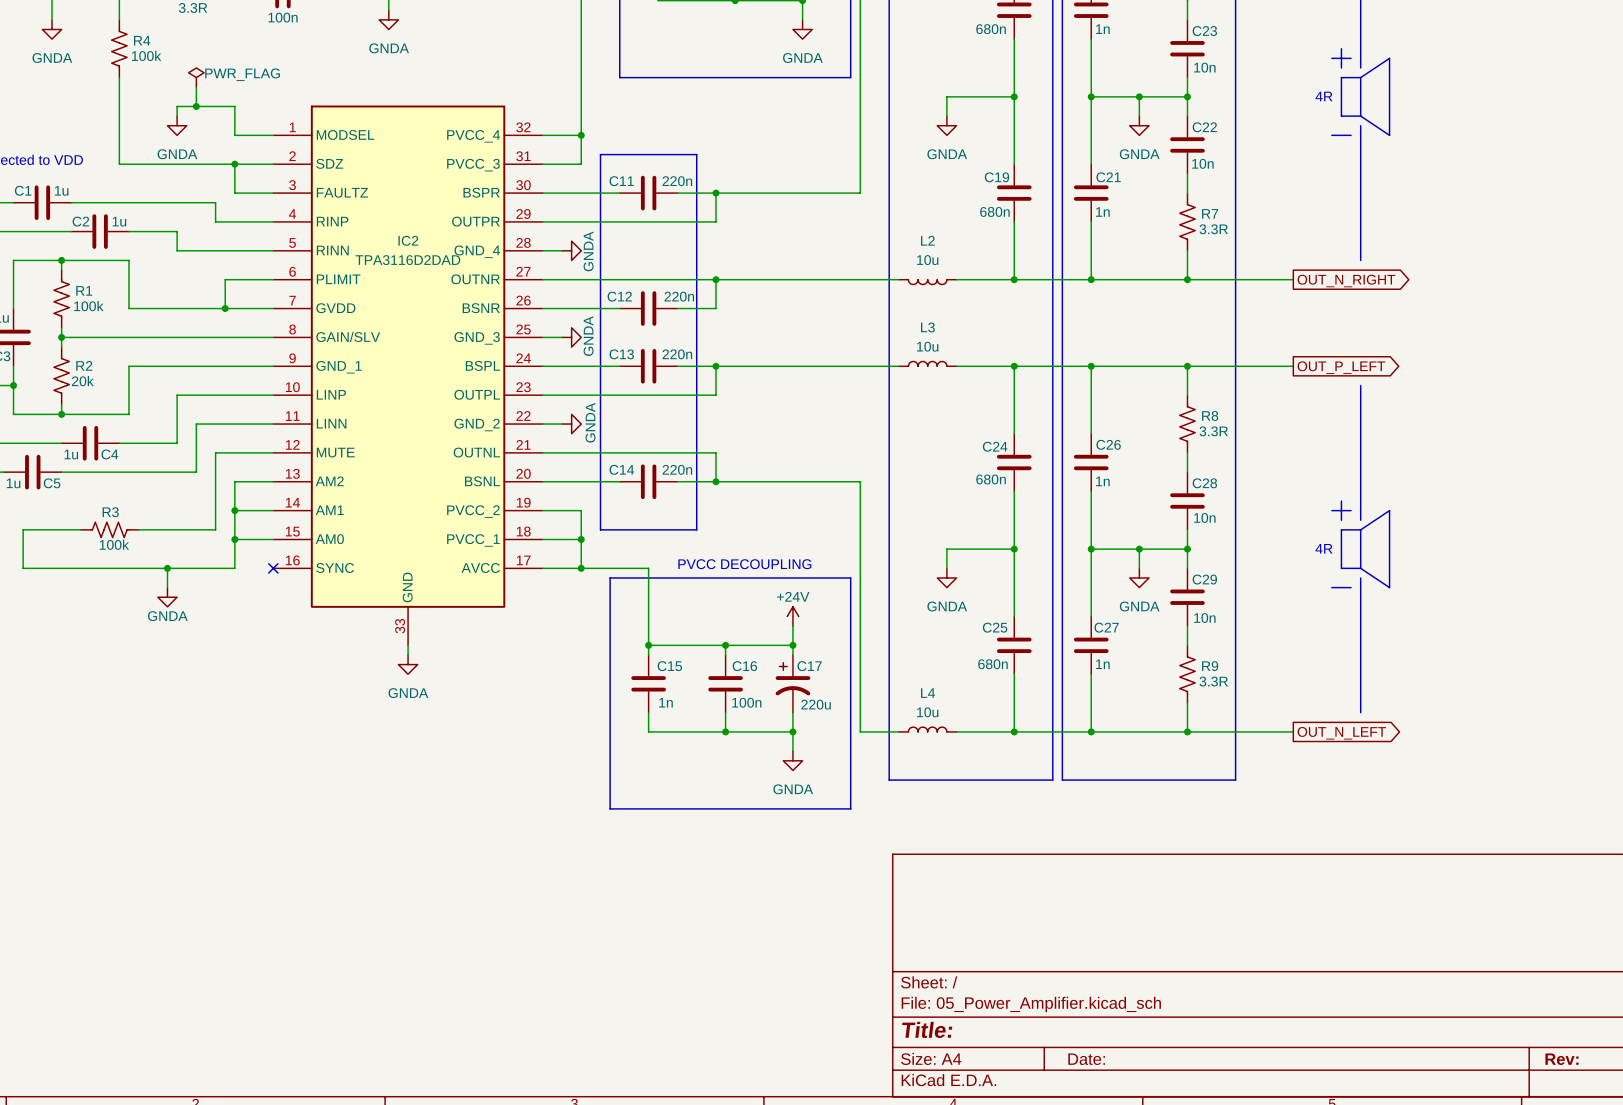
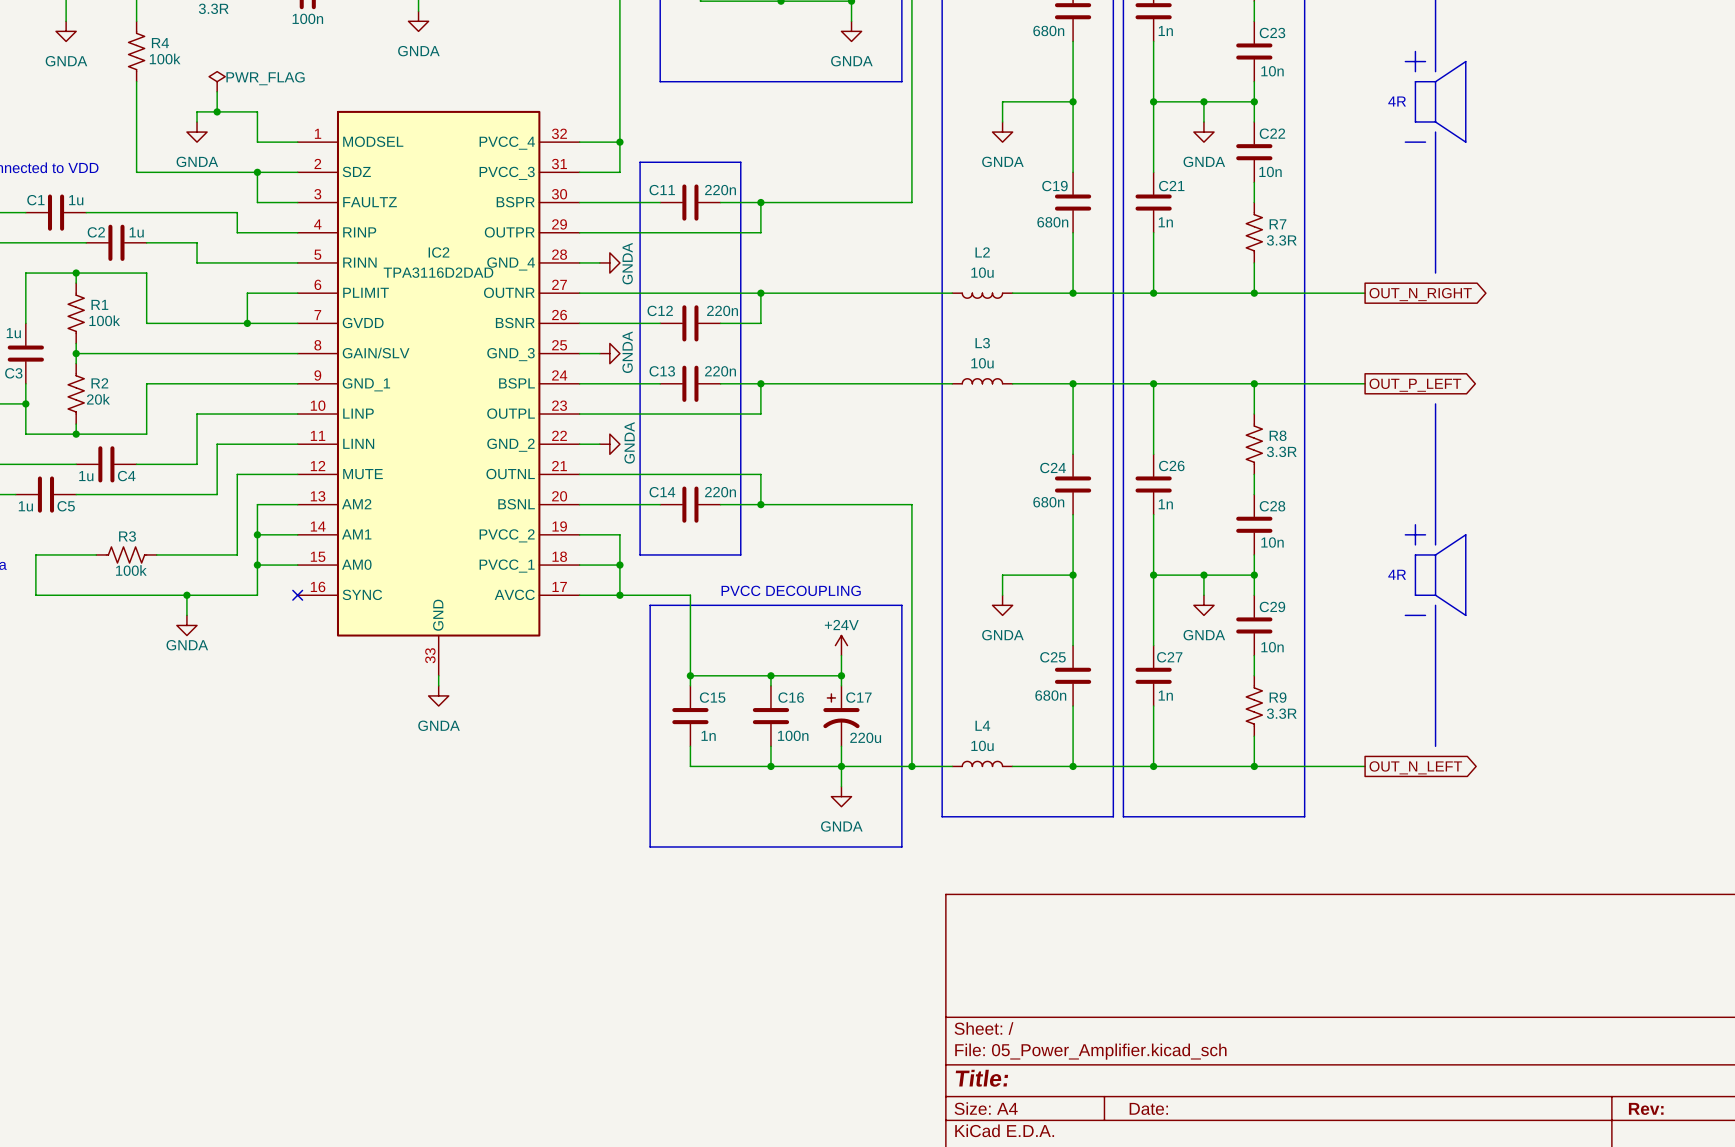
wire: none -> (841, 766) (911, 766)
junction: none -> (911, 766)

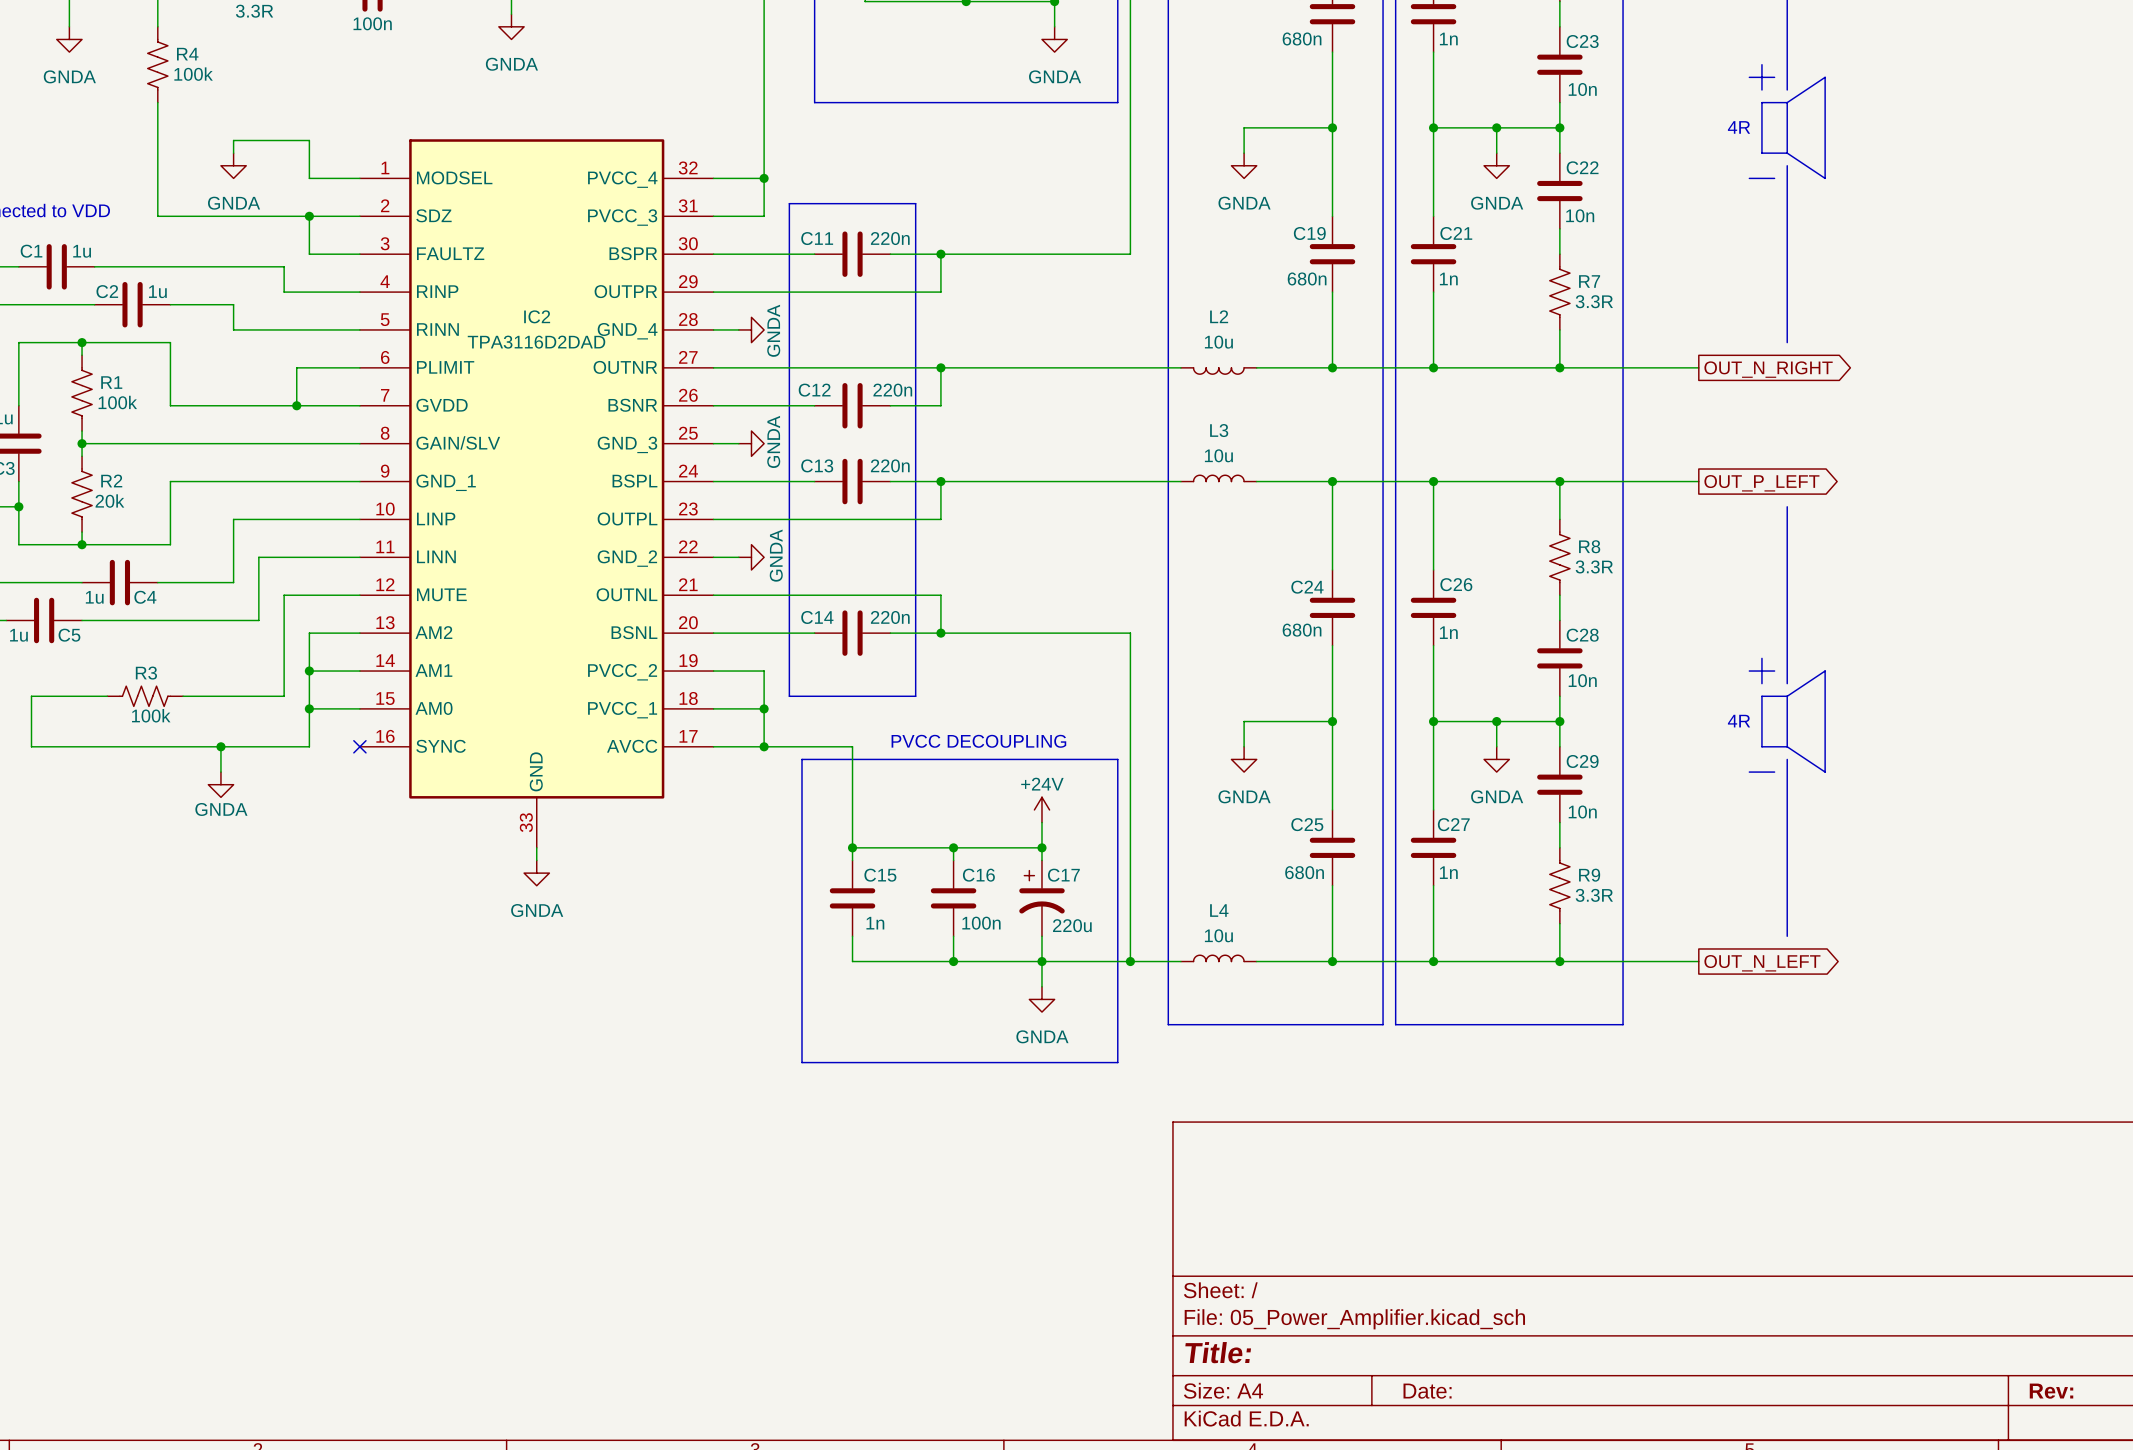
power symbol: PWR_FLAG (217, 81) -> none
wire: (217, 91) (217, 111) -> none
junction: (217, 111) -> none

